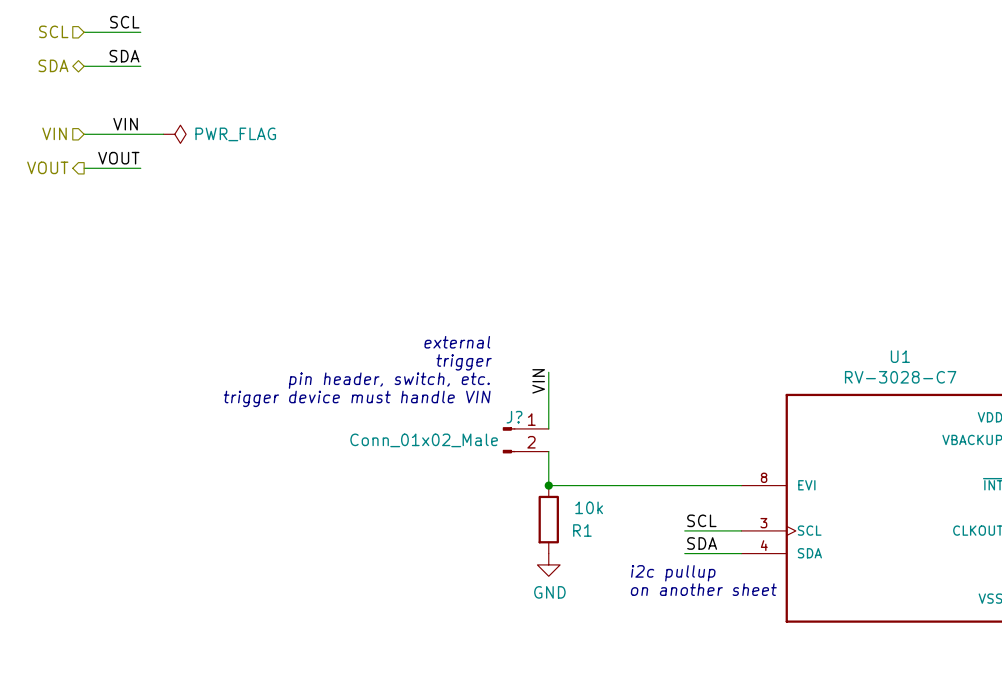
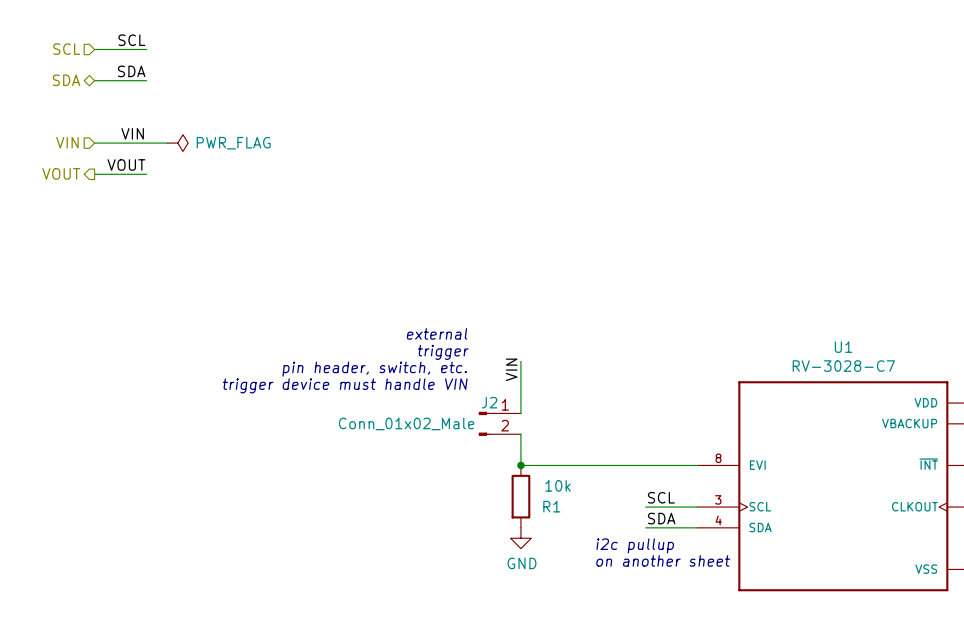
J? name: J? (514, 417) -> J2 (489, 402)

